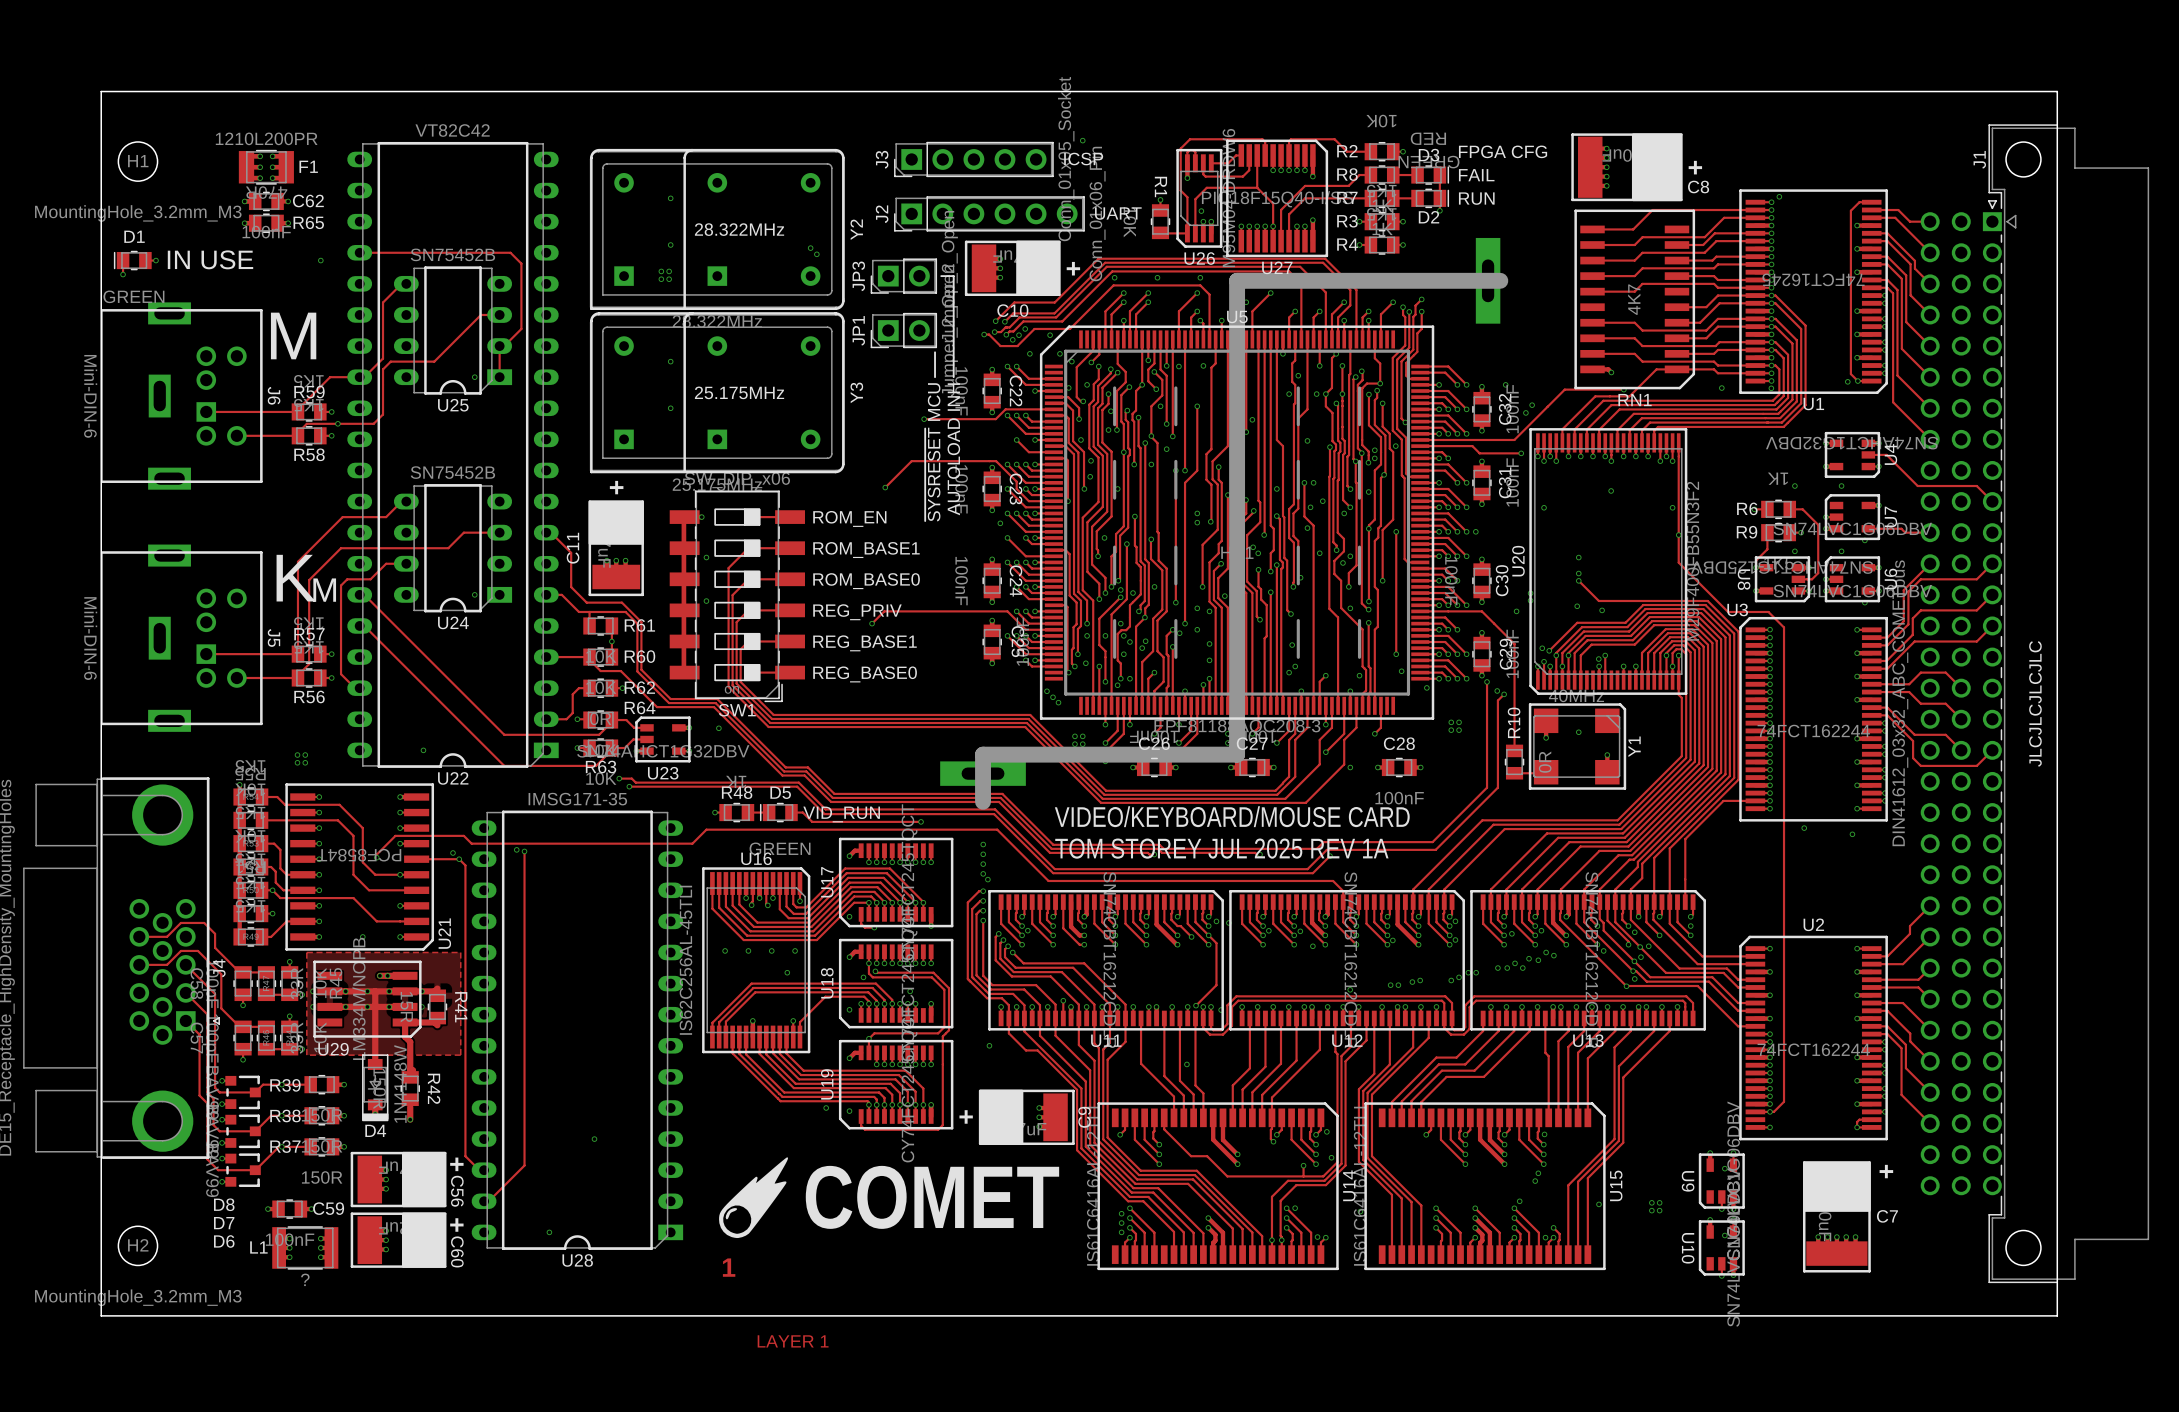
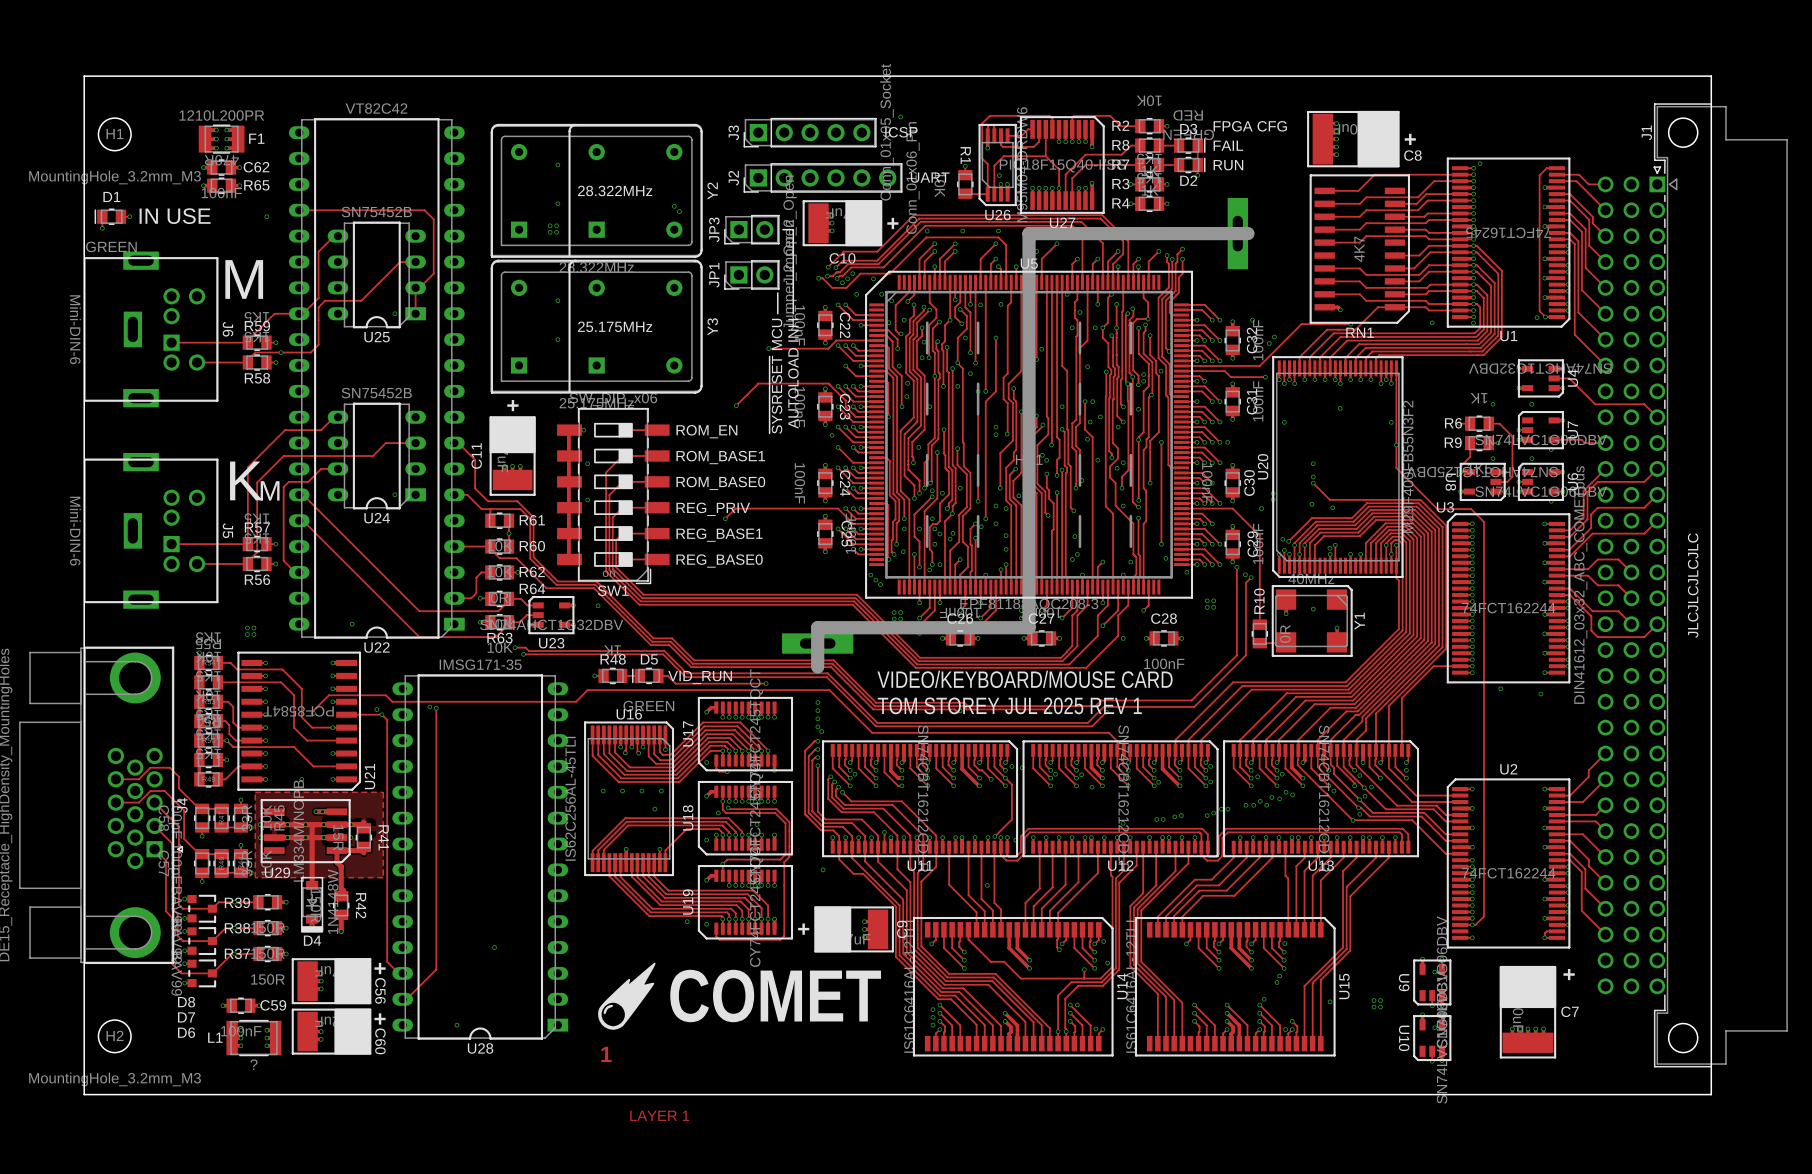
text: TOM STOREY JUL 2025 REV 1A (1221, 848) -> TOM STOREY JUL 2025 REV 1 (1009, 705)

